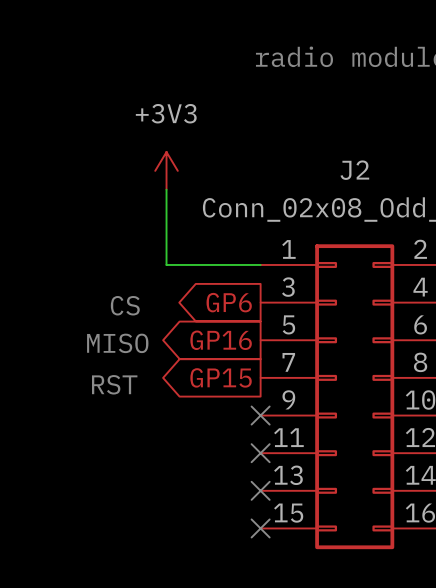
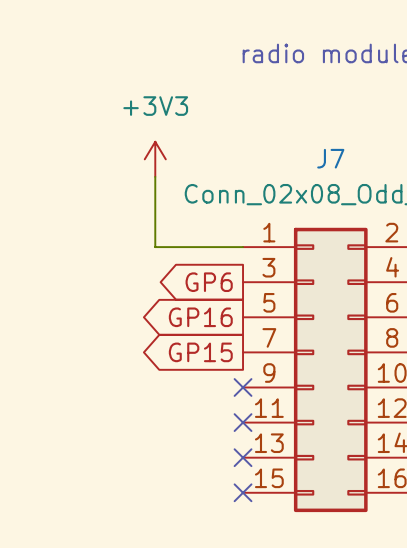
J2 name: J2 (354, 170) -> J7 (330, 158)
text: CS (125, 305) -> none
text: MISO (117, 343) -> none
text: RST (114, 384) -> none

